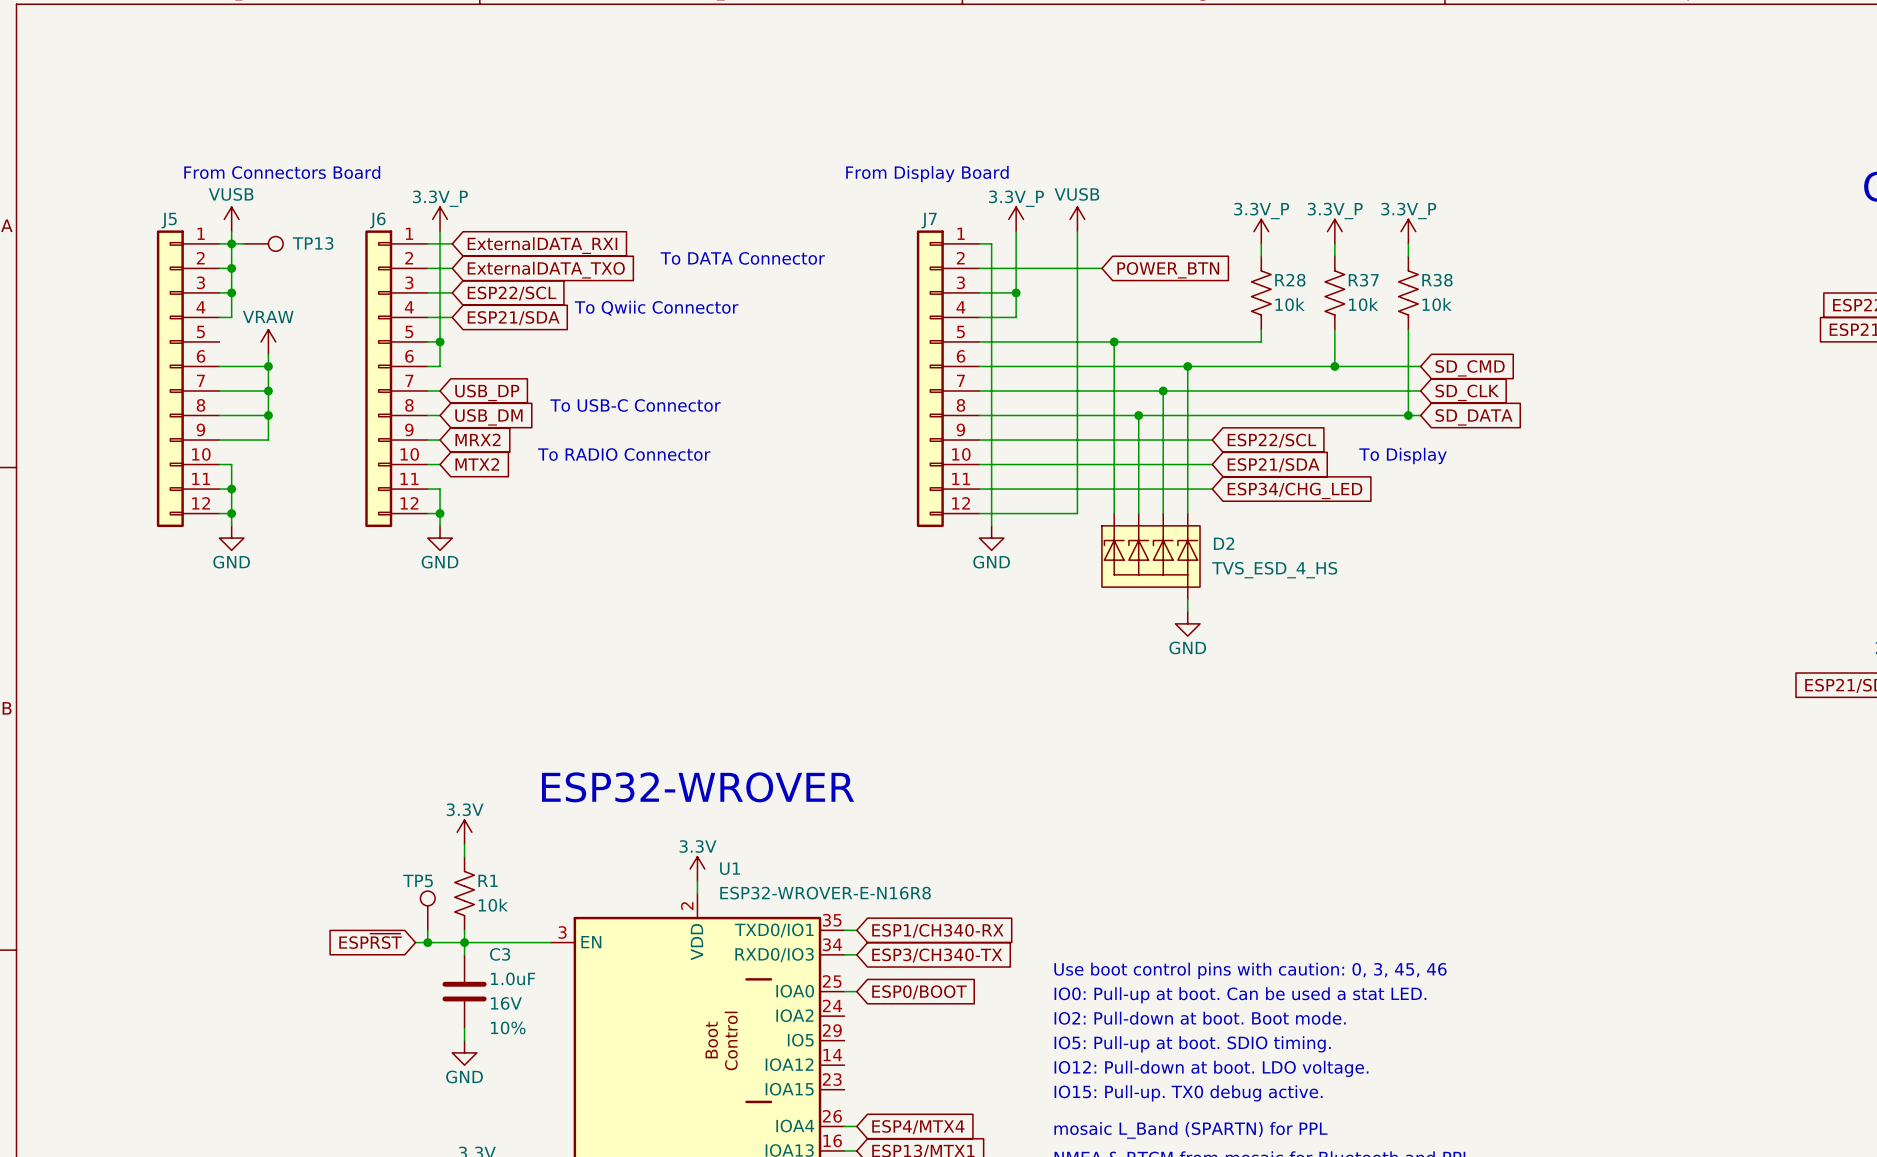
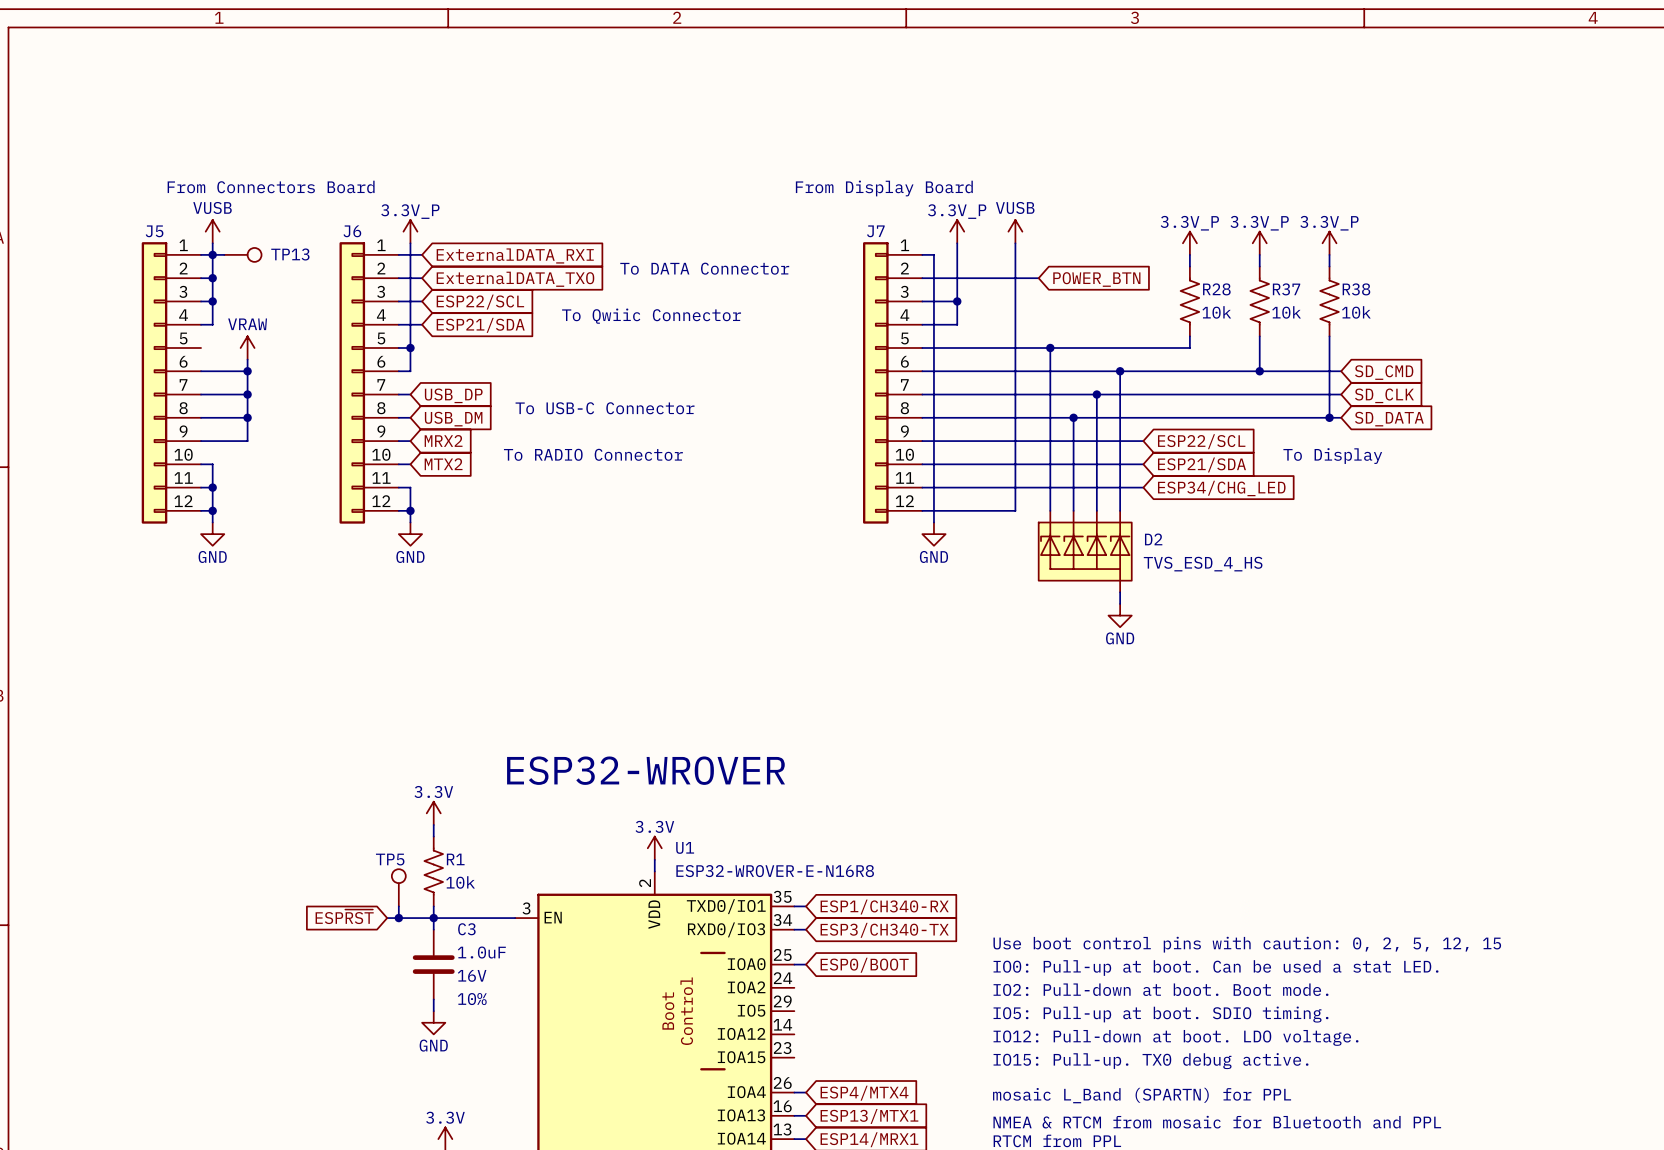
text position: To Qwiic Connector (656, 308) -> To Qwiic Connector (651, 316)
text: Use boot control pins with caution: 0, 3, 45, 46 (1250, 970) -> Use boot control pins with caution: 0, 2, 5, 12, 15 (1247, 944)

